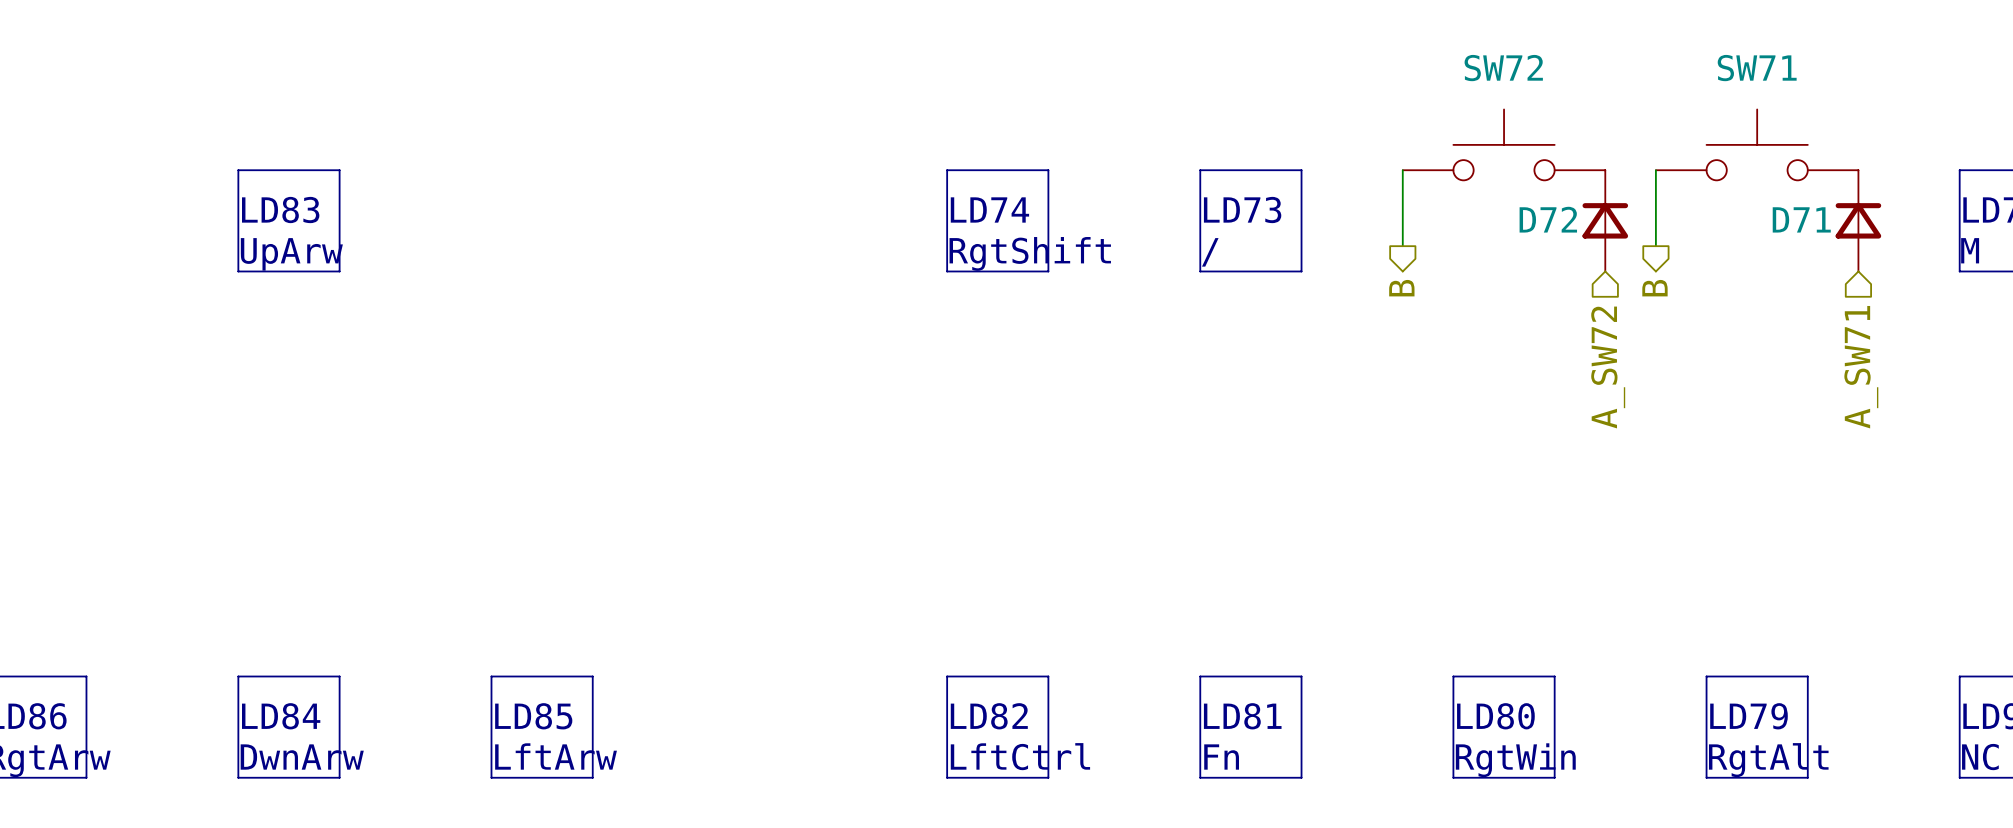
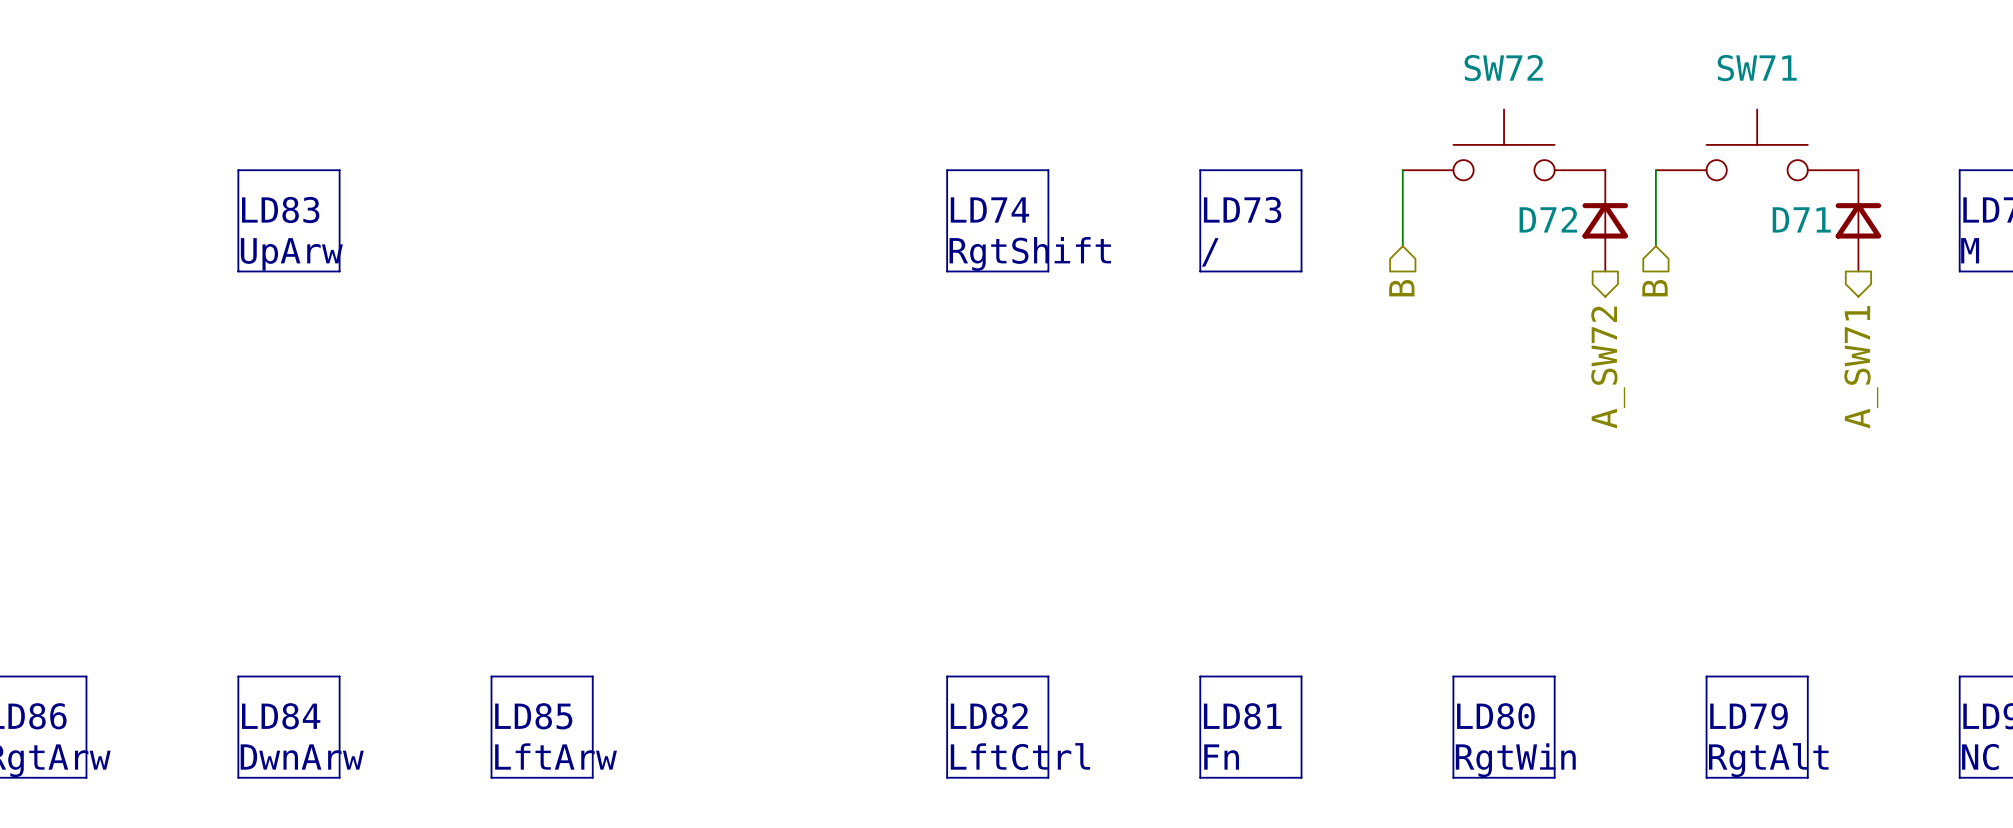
hierarchical label shape: output (1401, 288) -> input (1401, 288)
hierarchical label shape: output (1654, 288) -> input (1654, 288)
hierarchical label shape: input (1608, 367) -> output (1608, 367)
hierarchical label shape: input (1861, 367) -> output (1861, 367)

